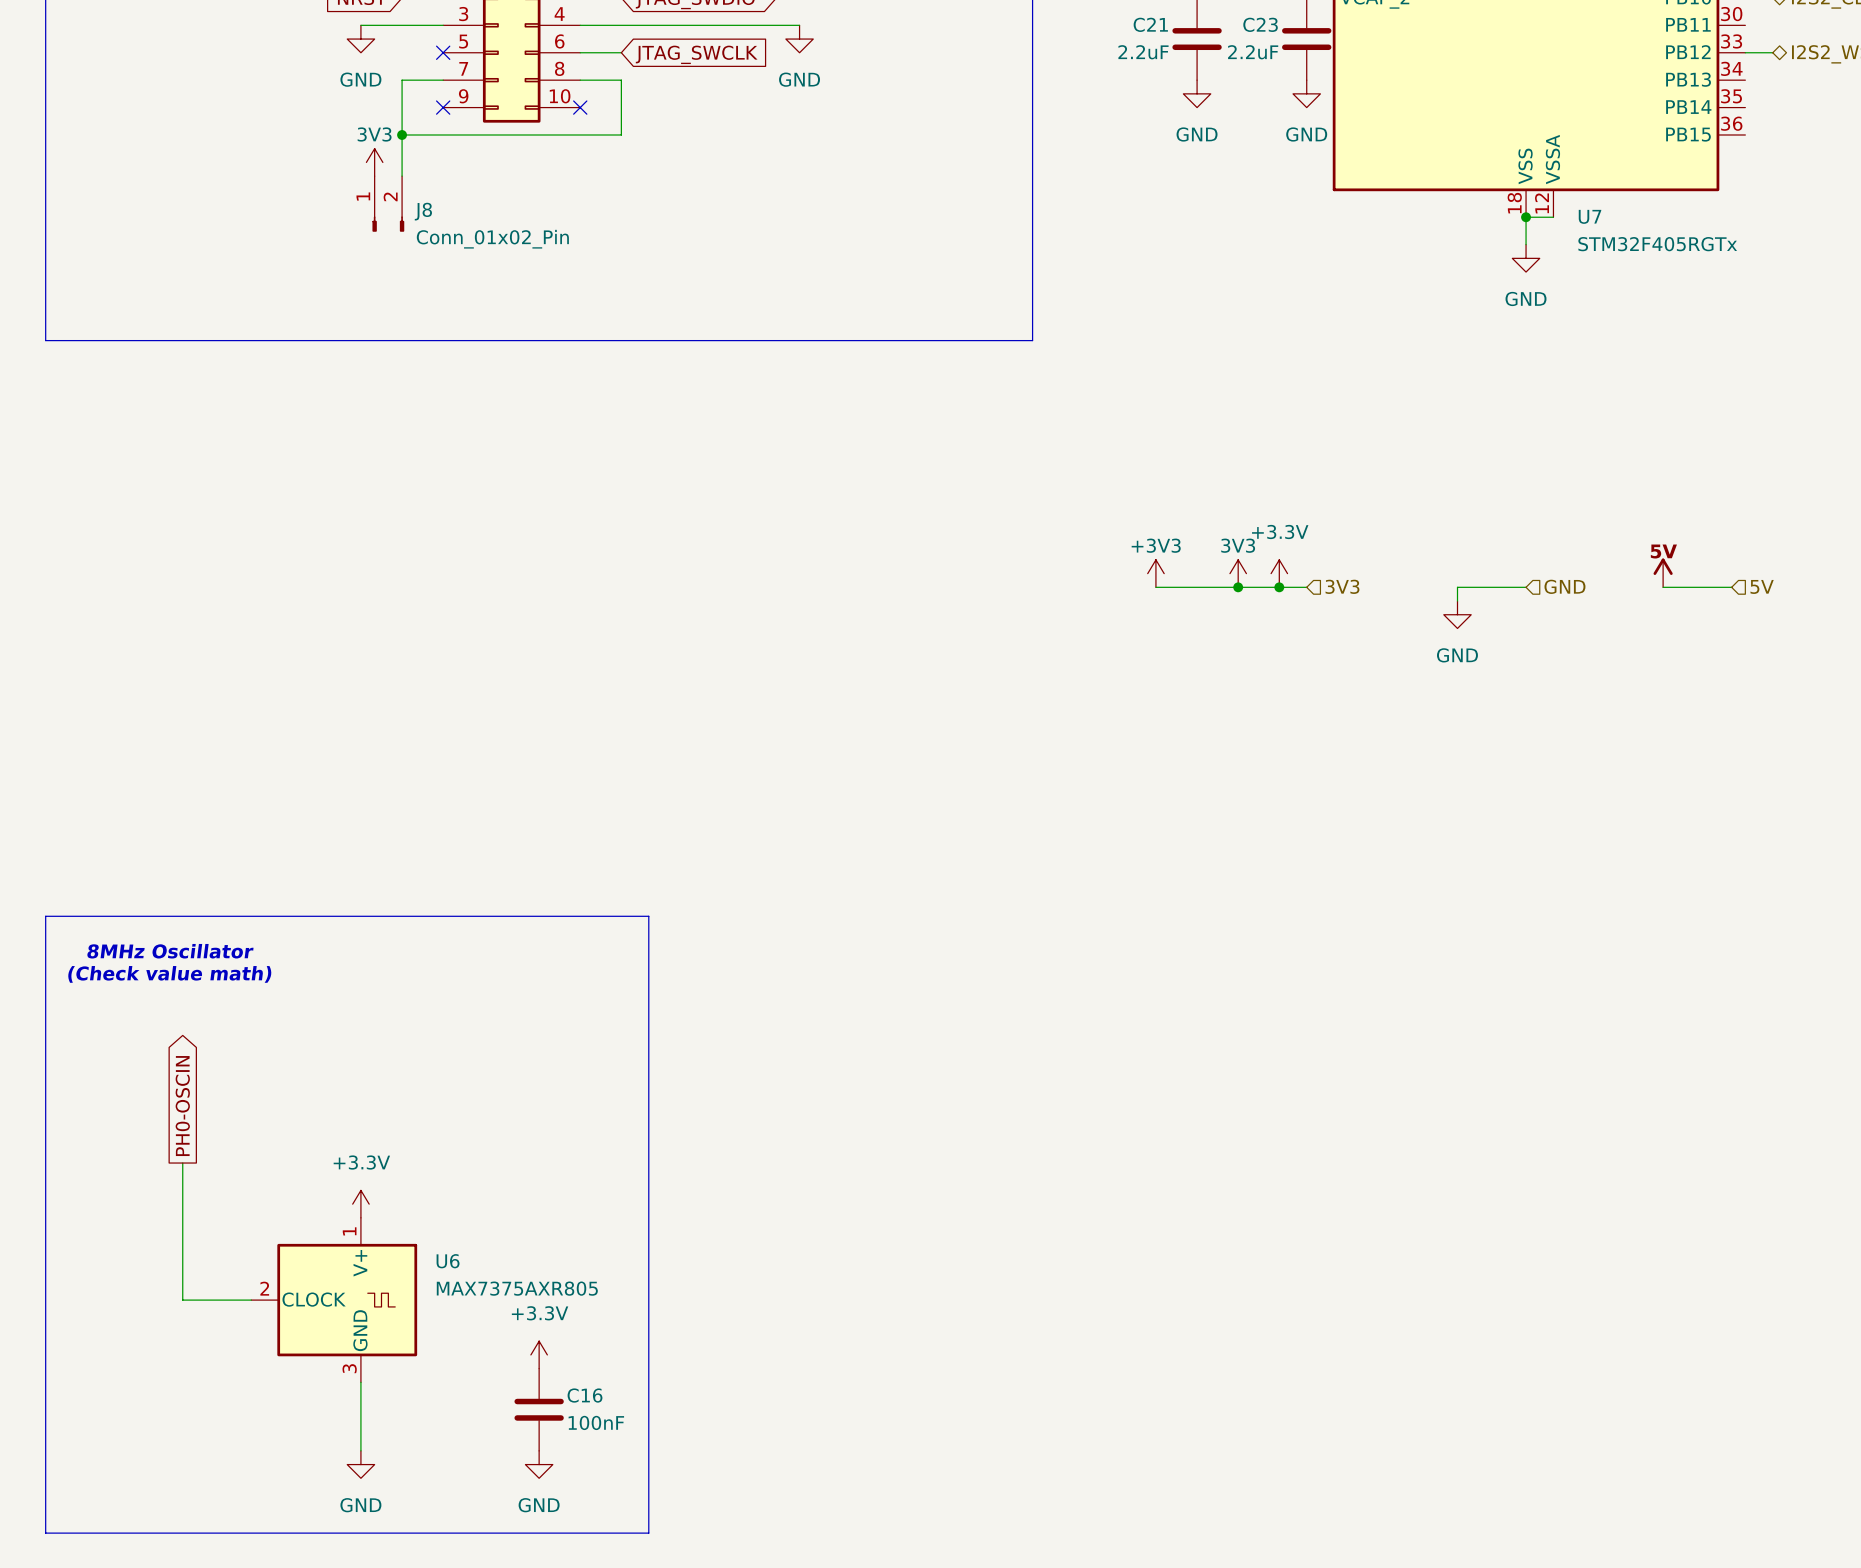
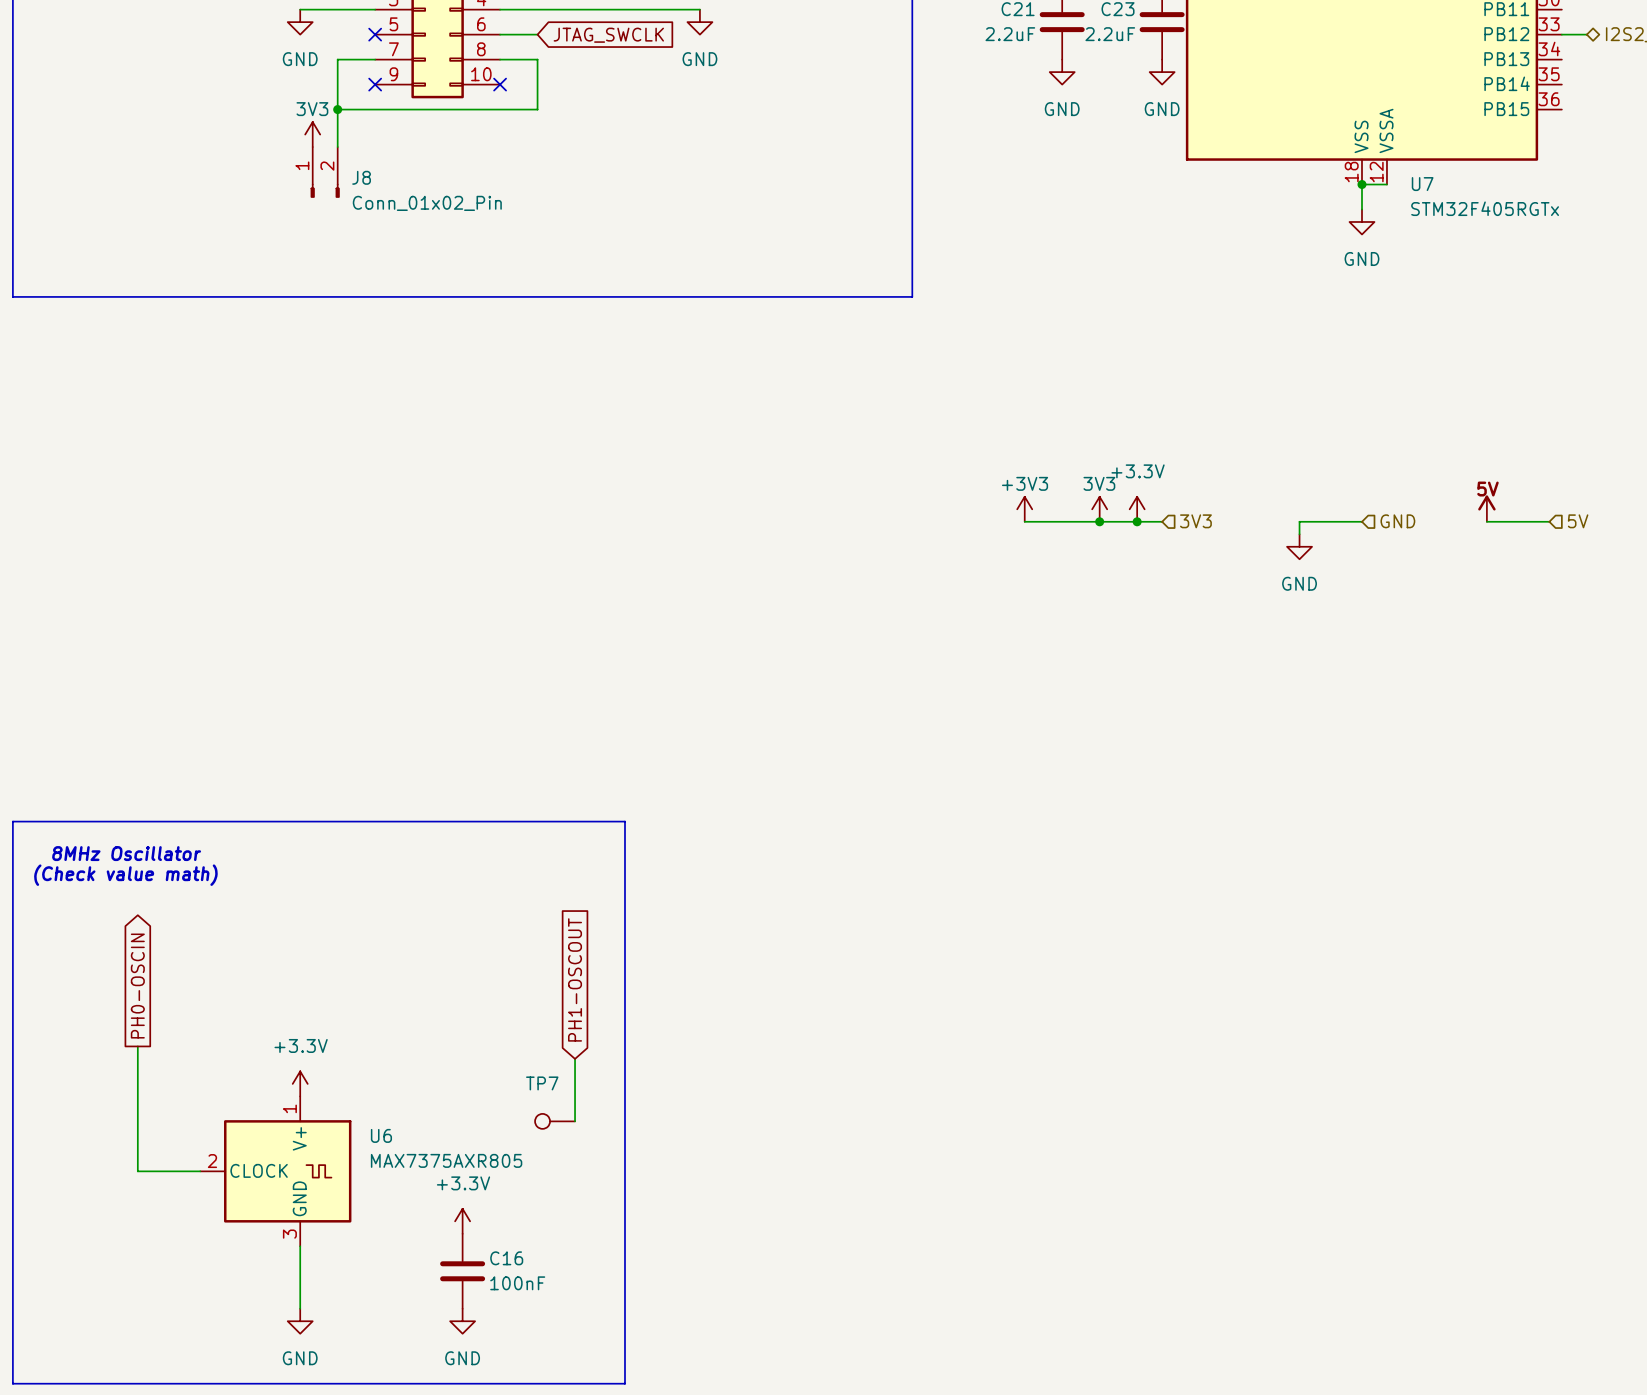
line: (648, 916) (648, 1533) -> (562, 821) (624, 821) (624, 1383) (562, 1383)
global label: none -> PH1-OSCOUT (575, 979)
wire: none -> (575, 1058) (575, 1121)
TP7: none -> (555, 1121)

